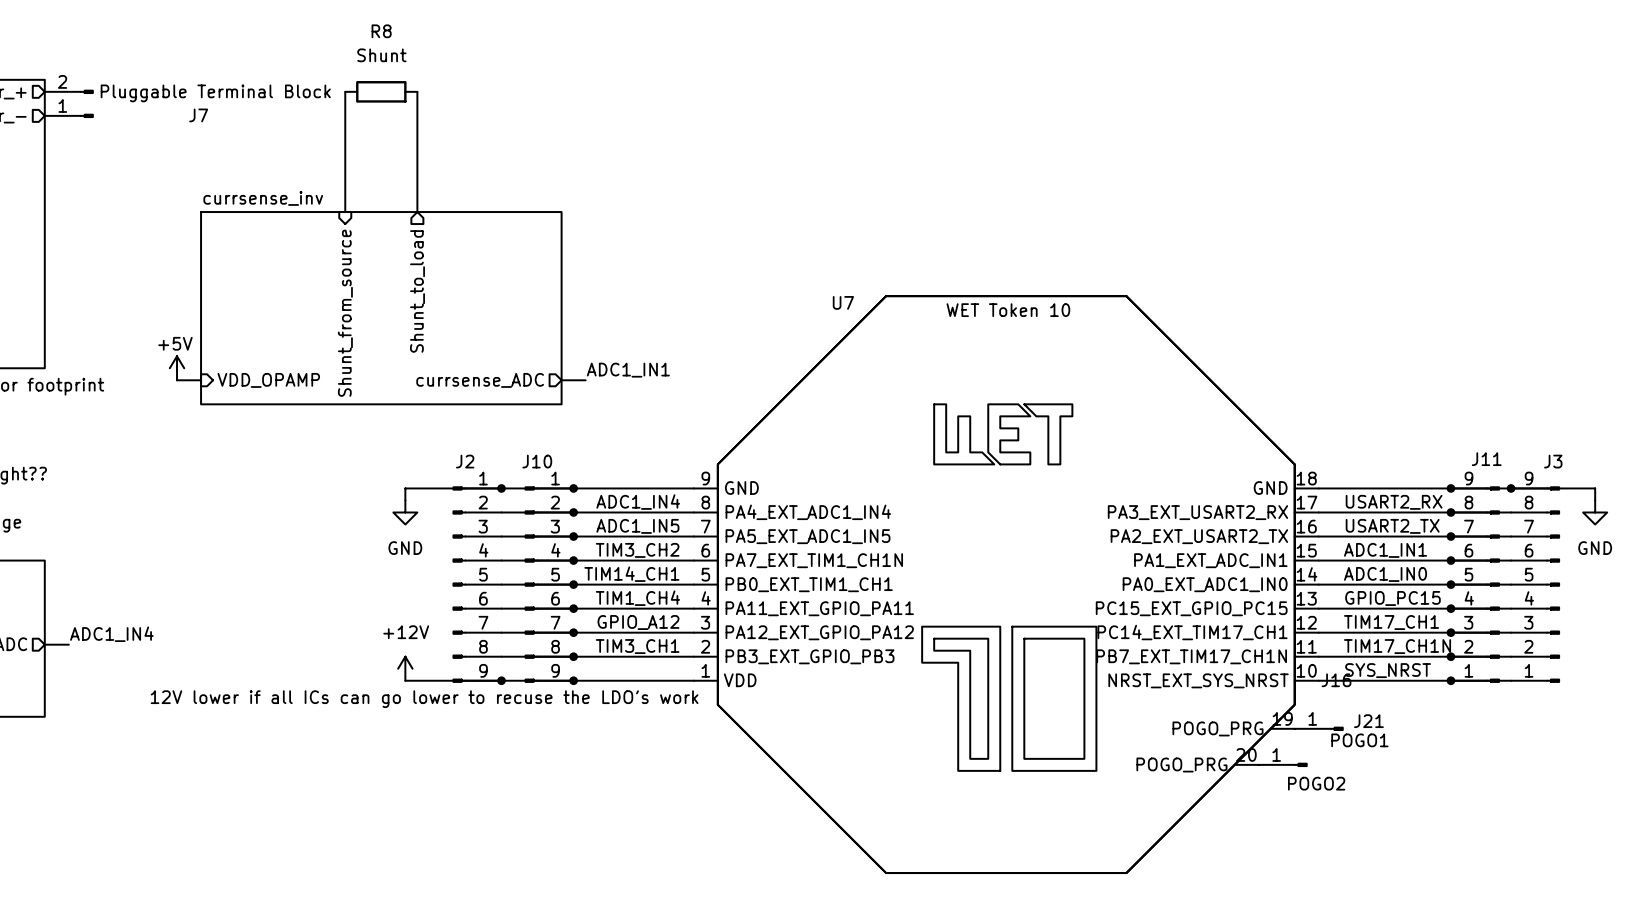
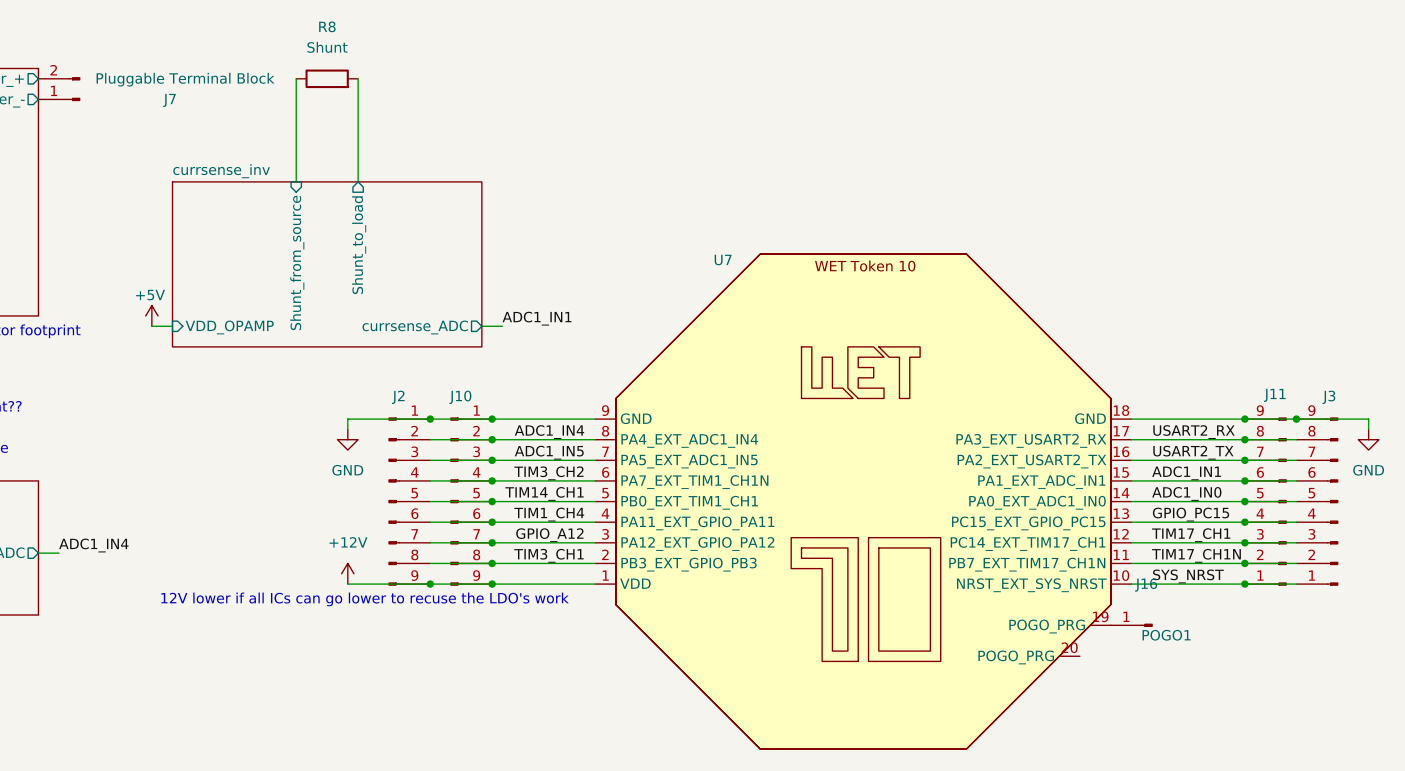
J21: POGO2 (1283, 764) -> none

